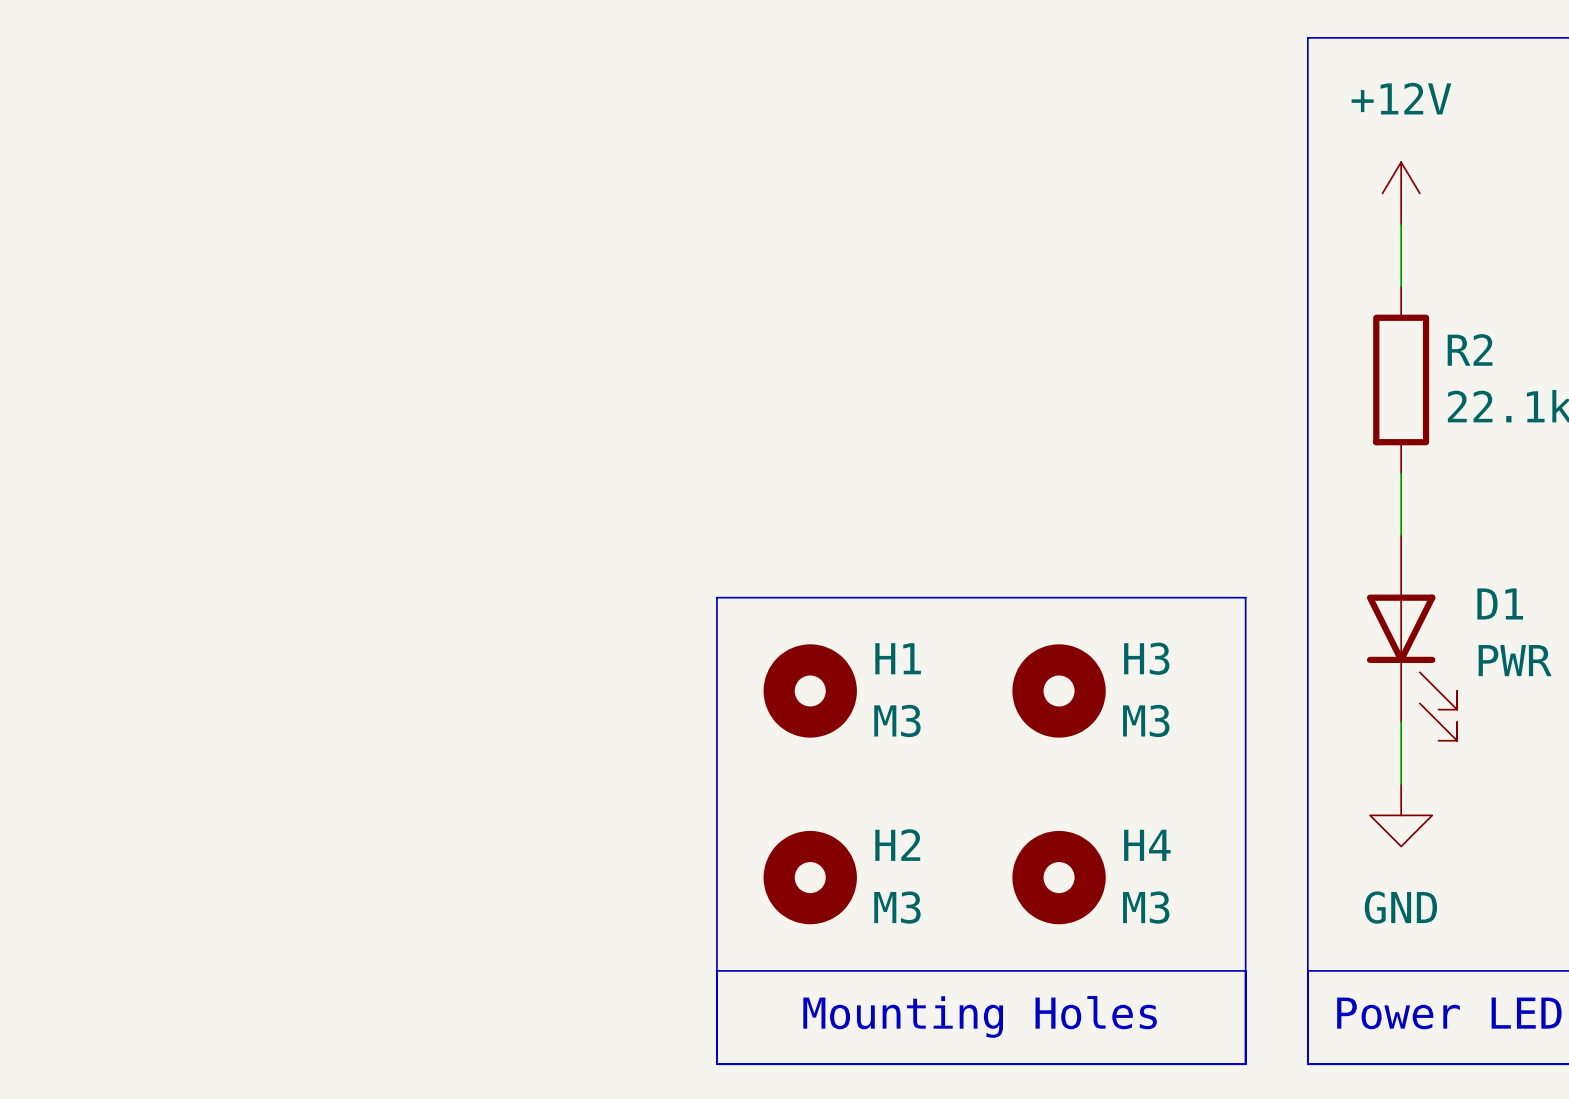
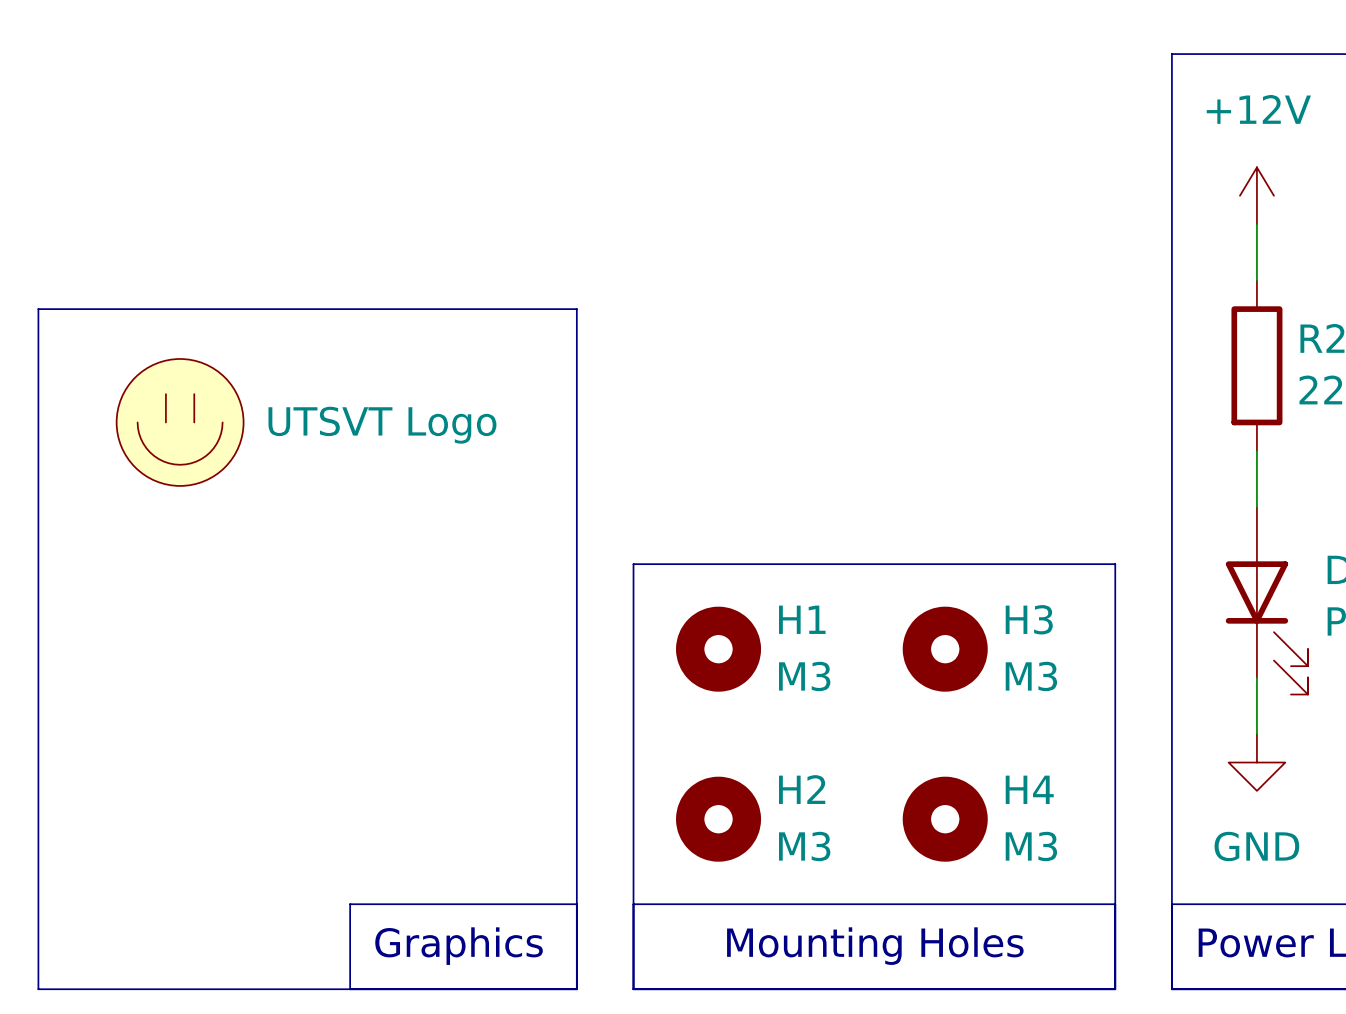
line: none -> (38, 309) (576, 309) (576, 989) (38, 989) (38, 309)
part: none -> UTSVT Logo (180, 422)
line: none -> (576, 904) (350, 904) (350, 989)
text: none -> Graphics (459, 946)

